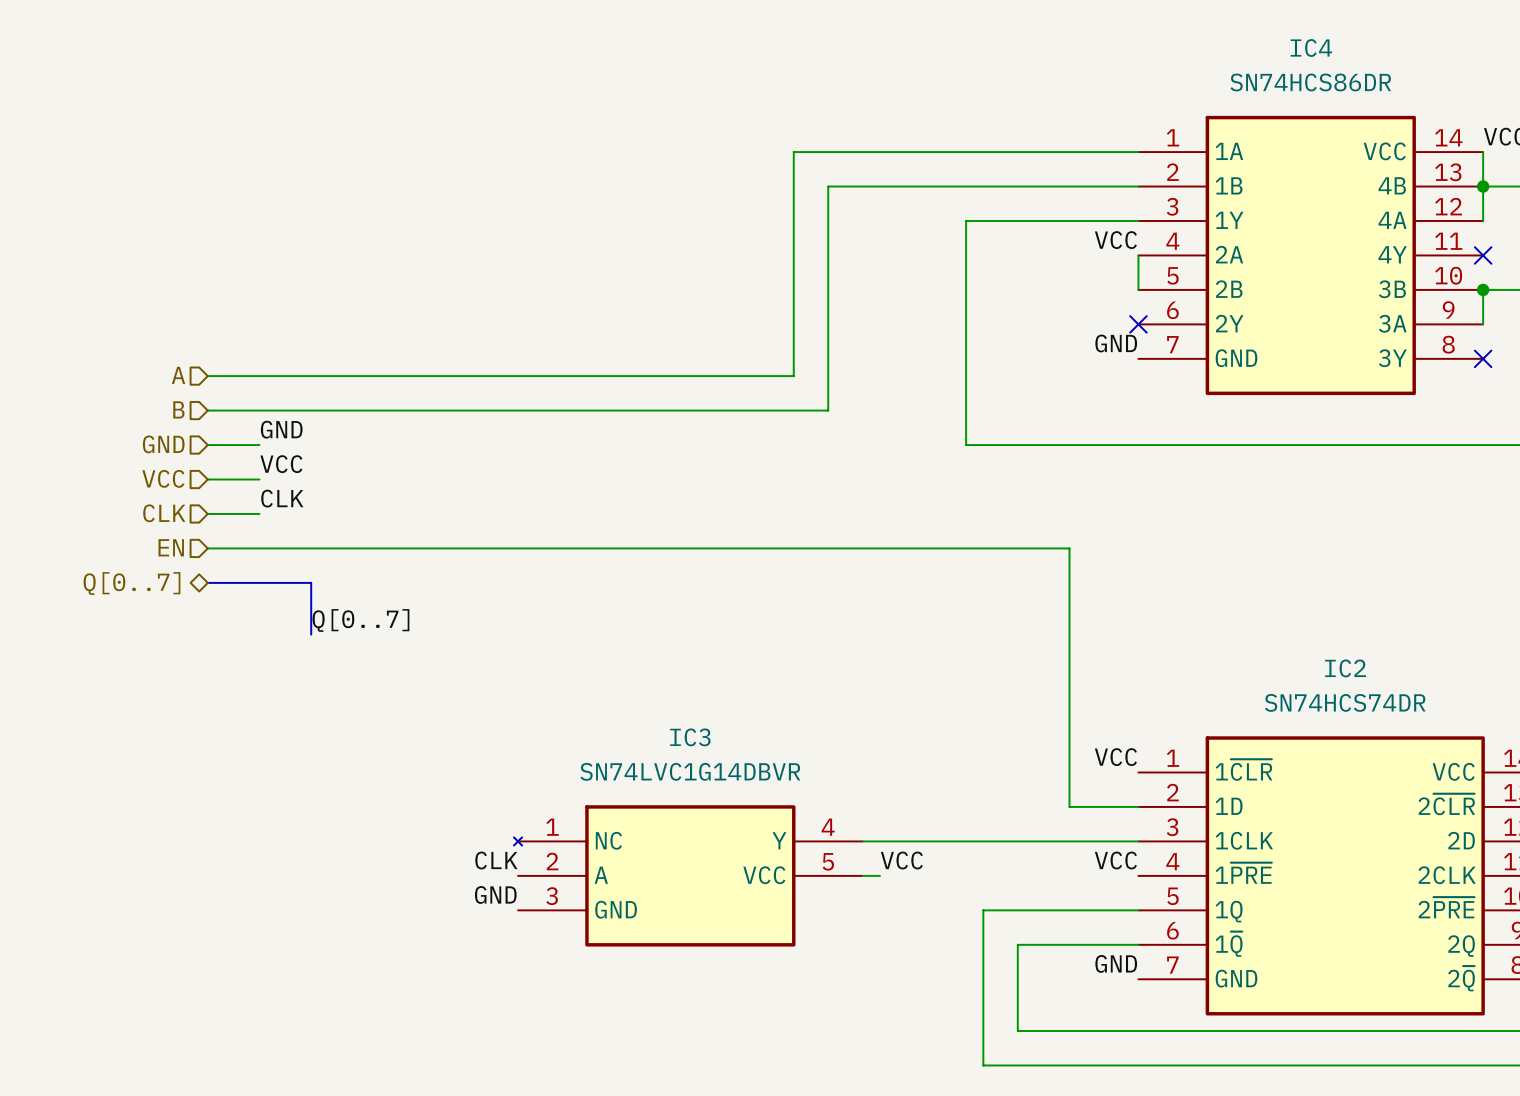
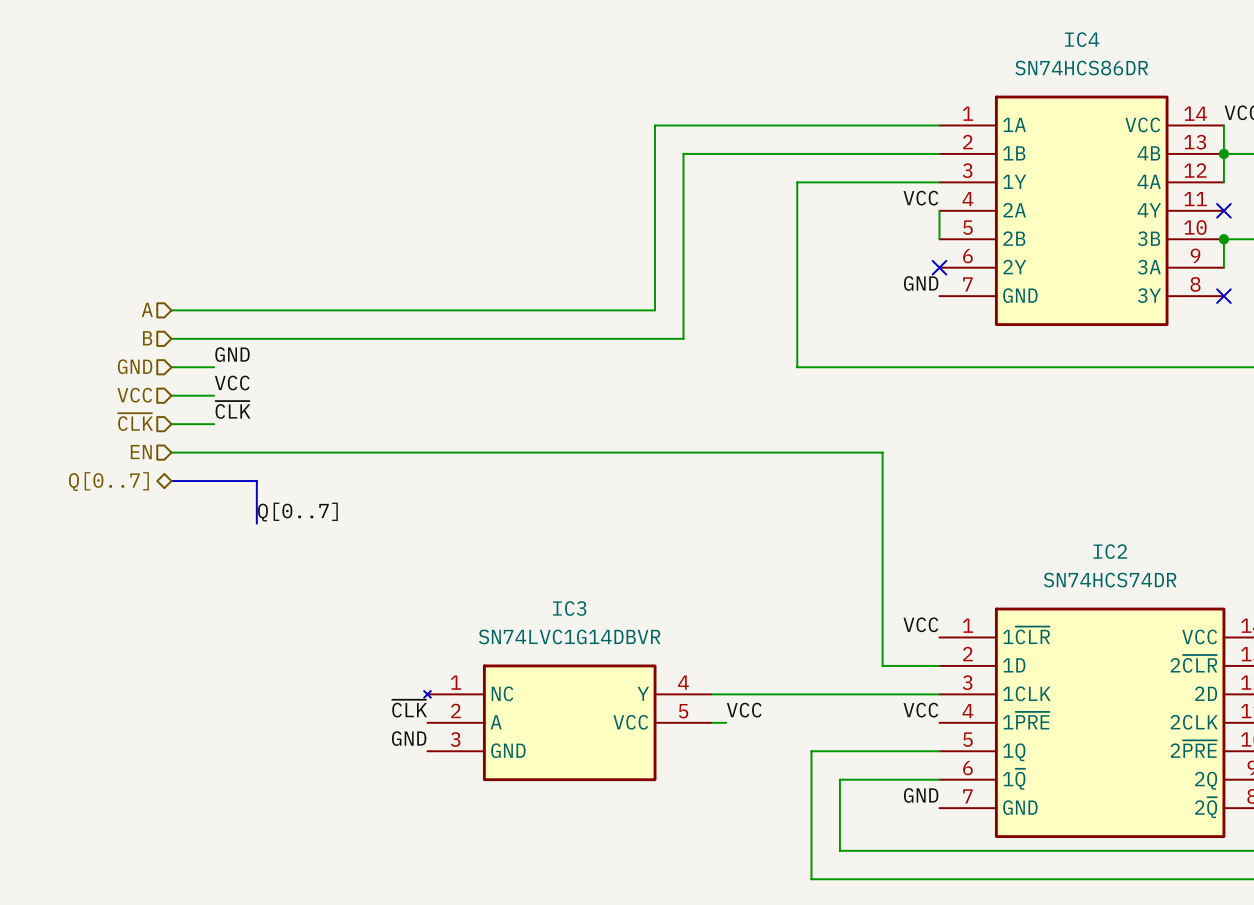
label: CLK (282, 498) -> ~{CLK} (232, 409)
hierarchical label: CLK (164, 513) -> ~{CLK} (135, 422)
label: CLK (496, 860) -> ~{CLK} (409, 708)

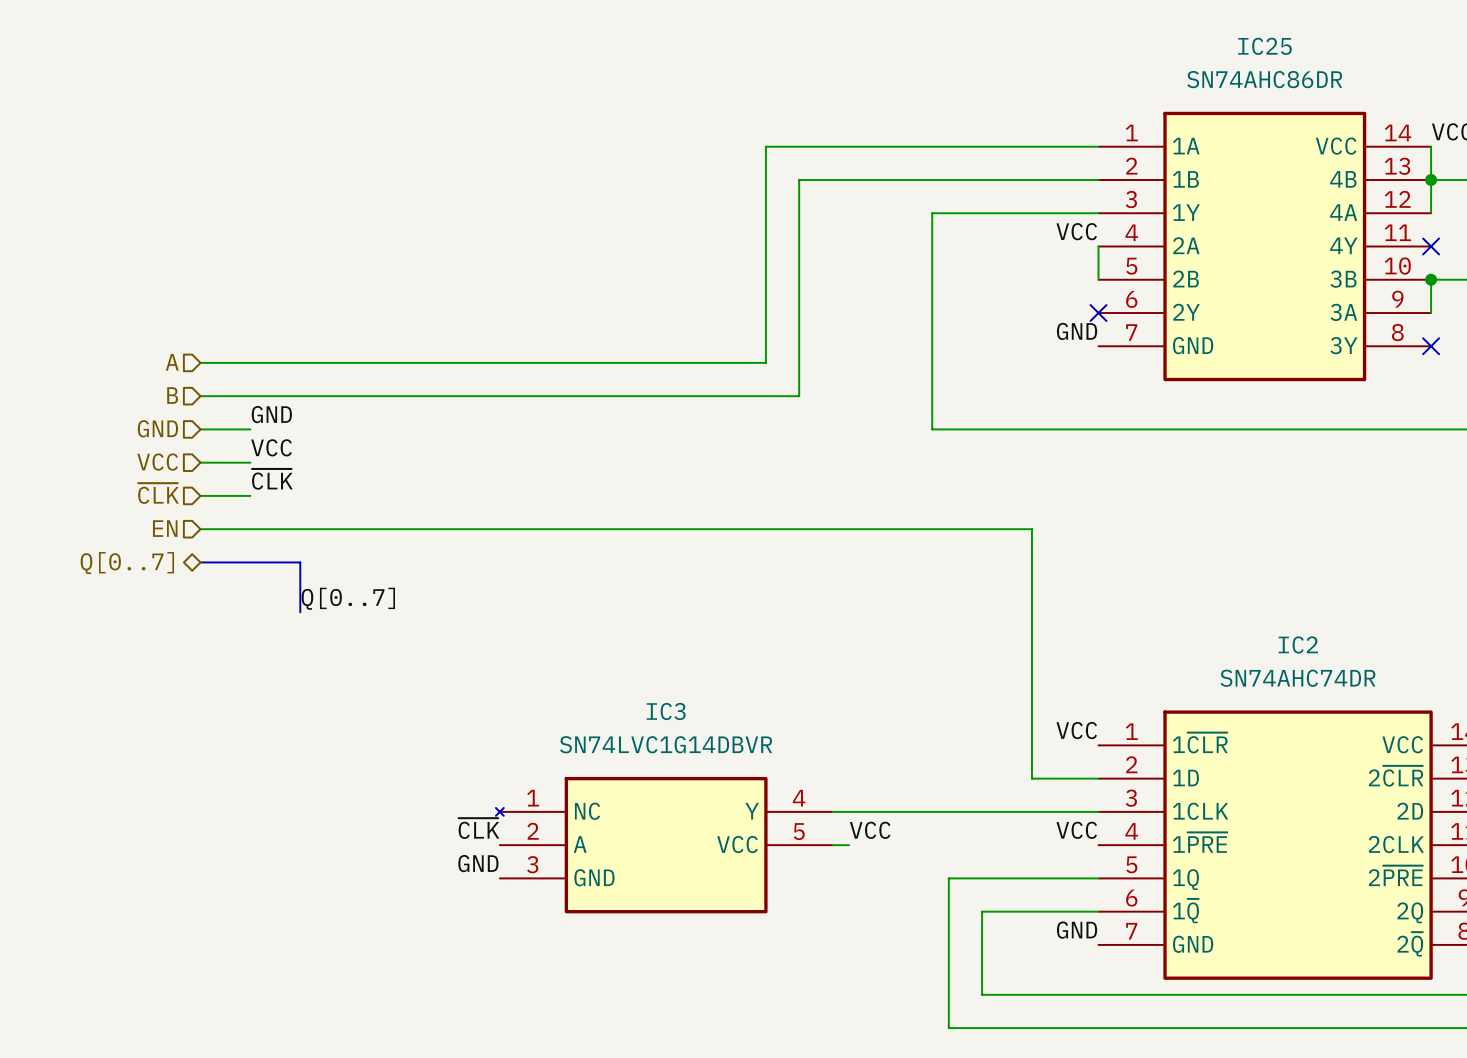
IC4 name: IC4 (1082, 39) -> IC25 (1265, 46)
IC4 value: SN74HCS86DR (1081, 68) -> SN74AHC86DR (1264, 79)
IC2 value: SN74HCS74DR (1110, 580) -> SN74AHC74DR (1297, 678)

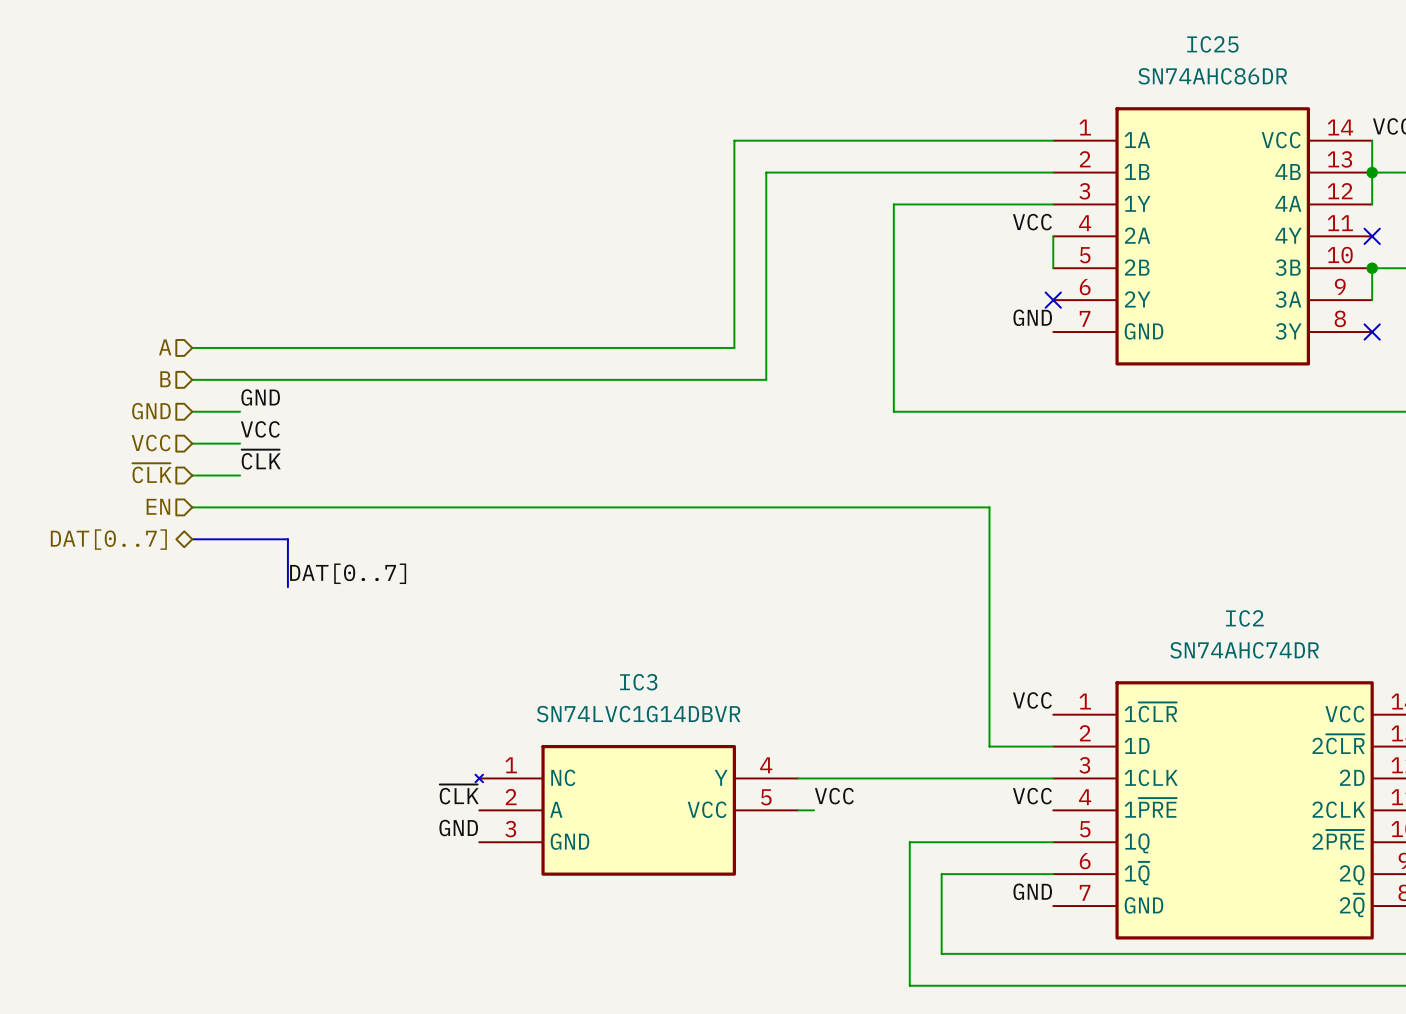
hierarchical label: Q[0..7] (127, 563) -> DAT[0..7] (108, 539)
label: Q[0..7] (348, 598) -> DAT[0..7] (348, 573)

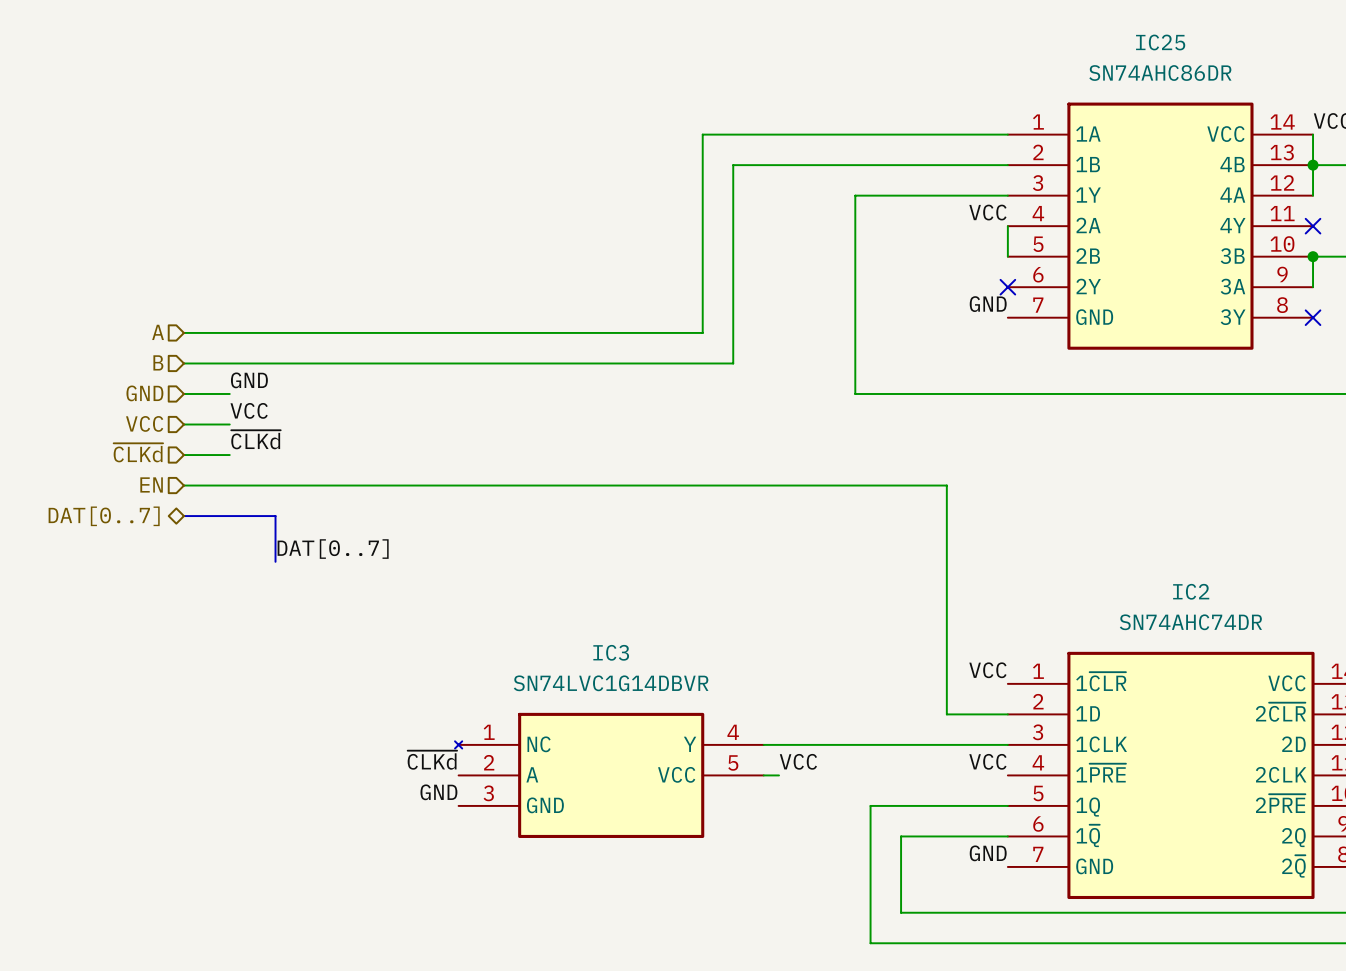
label: ~{CLK} (261, 459) -> ~{CLKd} (255, 439)
hierarchical label: ~{CLK} (151, 473) -> ~{CLKd} (138, 452)
label: ~{CLK} (459, 794) -> ~{CLKd} (432, 760)

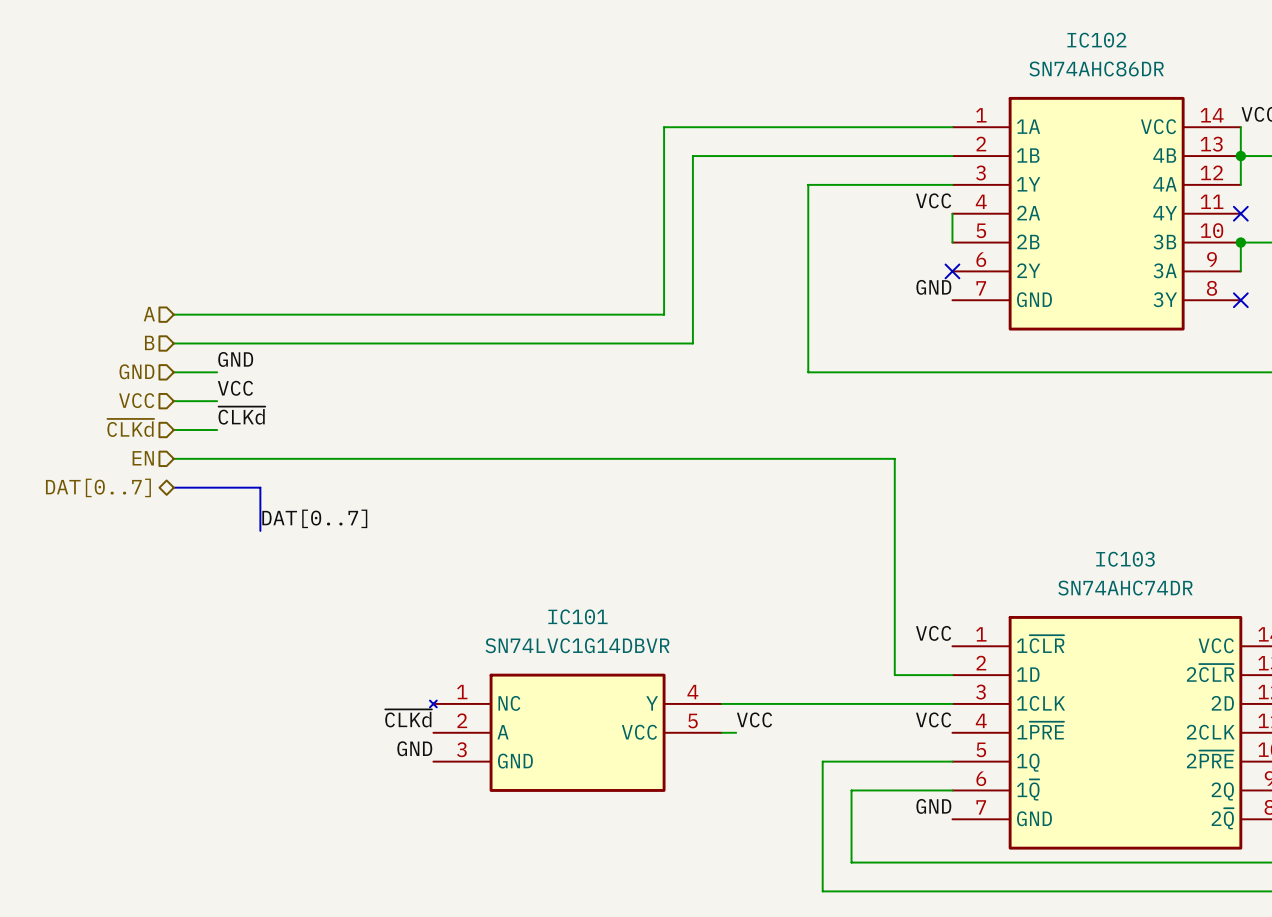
IC25 name: IC25 (1160, 42) -> IC102 (1096, 40)
IC2 name: IC2 (1191, 591) -> IC103 (1125, 559)
IC3 name: IC3 (611, 652) -> IC101 (577, 616)

